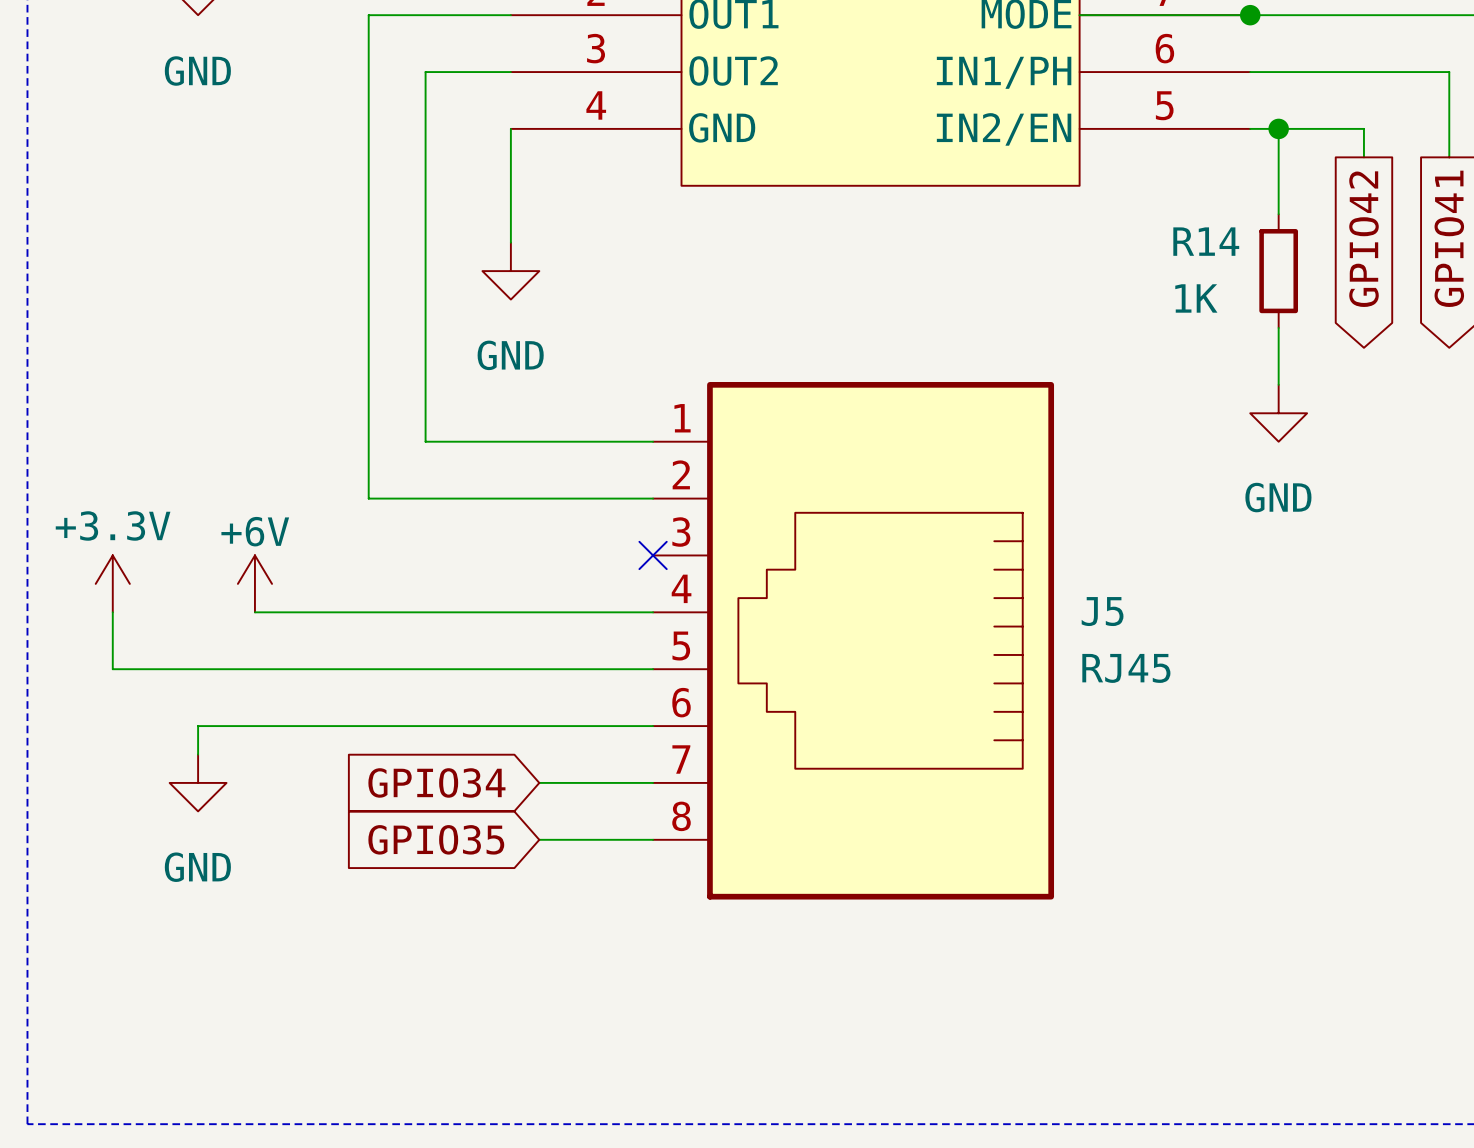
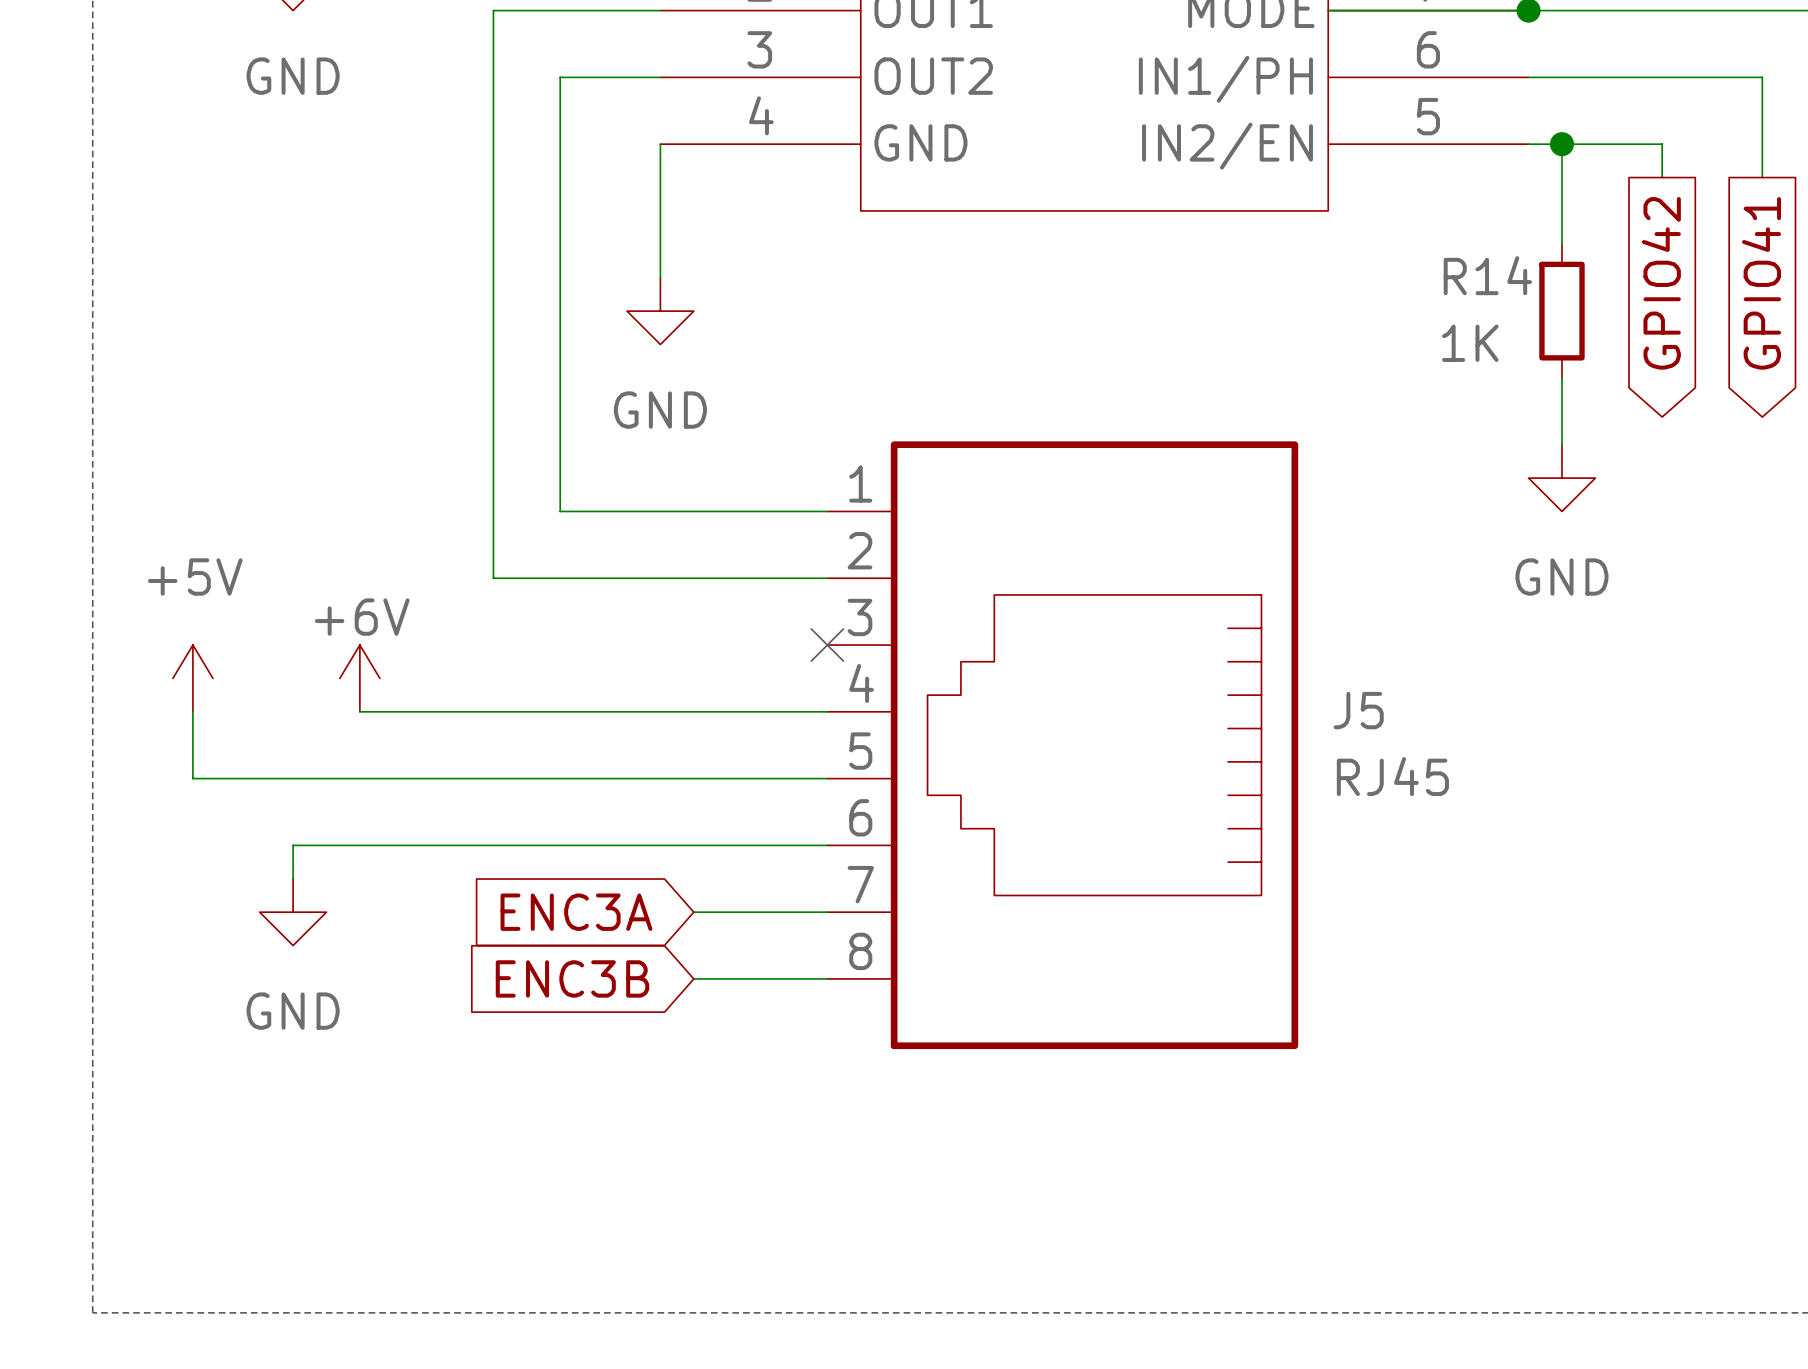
power symbol: +3.3V (112, 583) -> +5V (192, 678)
global label: GPIO34 (436, 782) -> ENC3A (576, 912)
global label: GPIO35 (436, 839) -> ENC3B (572, 978)

